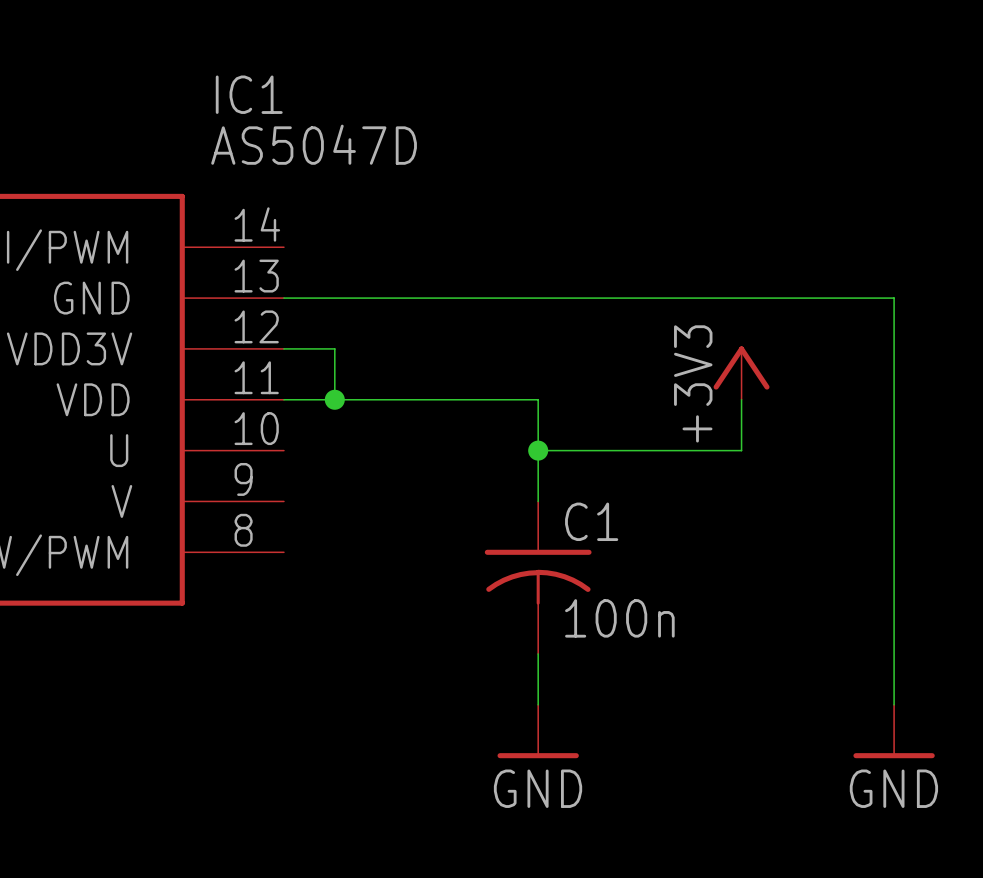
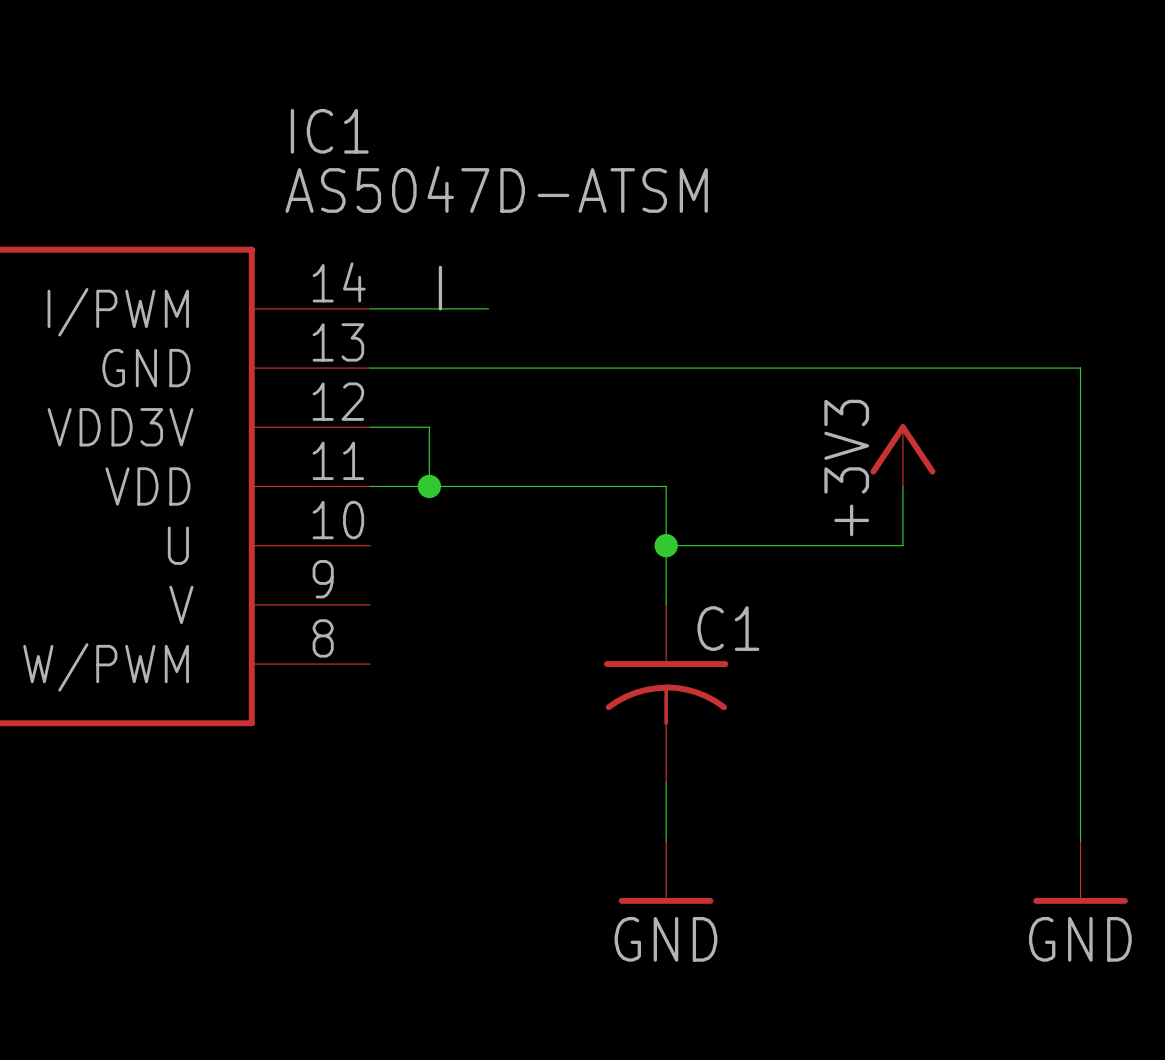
IC1 value: AS5047D (314, 144) -> AS5047D-ATSM (496, 189)
label: none -> I (440, 288)
wire: none -> (370, 308) (488, 308)
C1 value: 100n (619, 618) -> none

